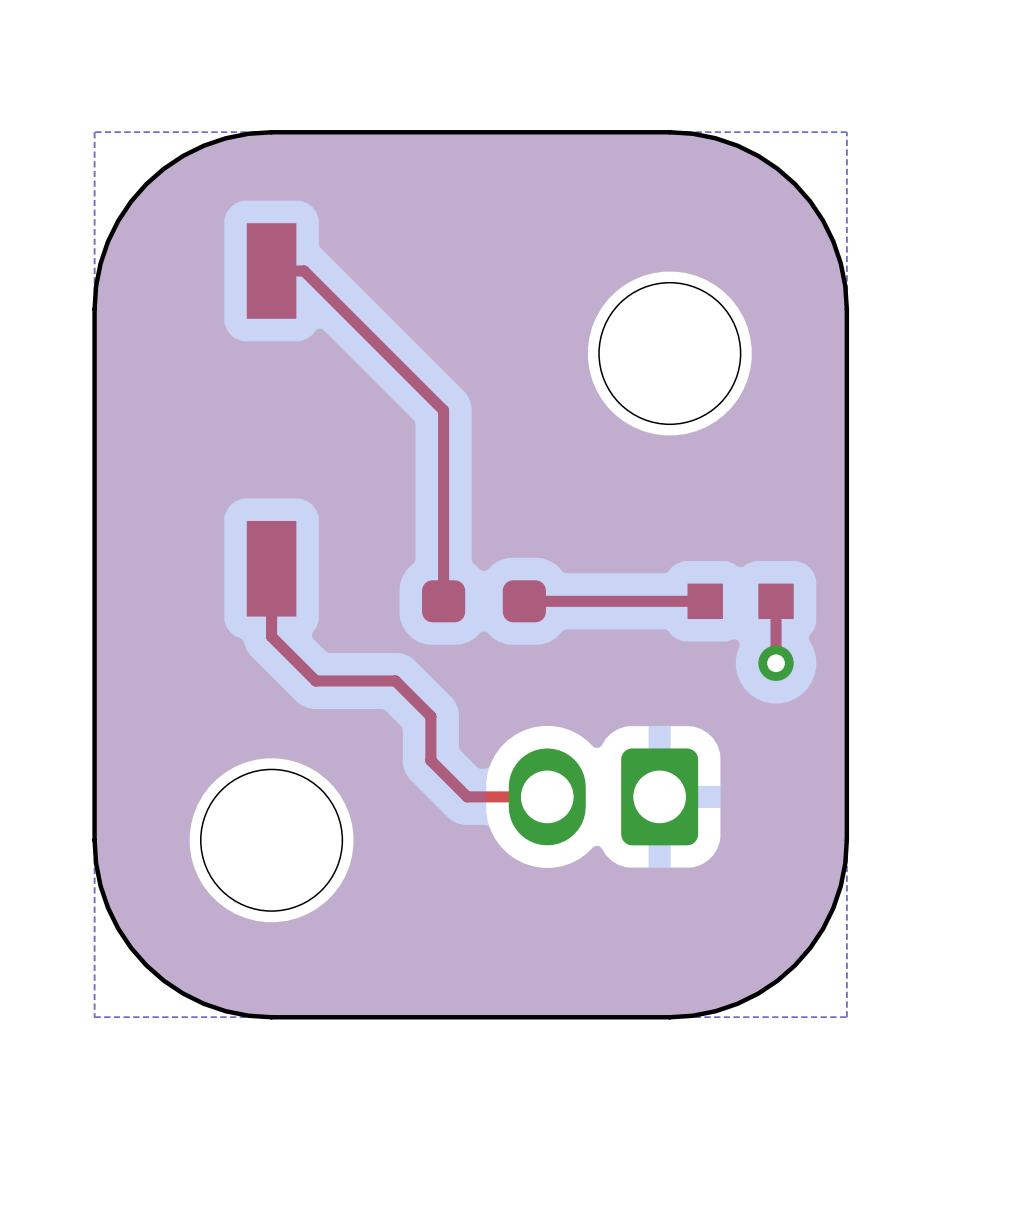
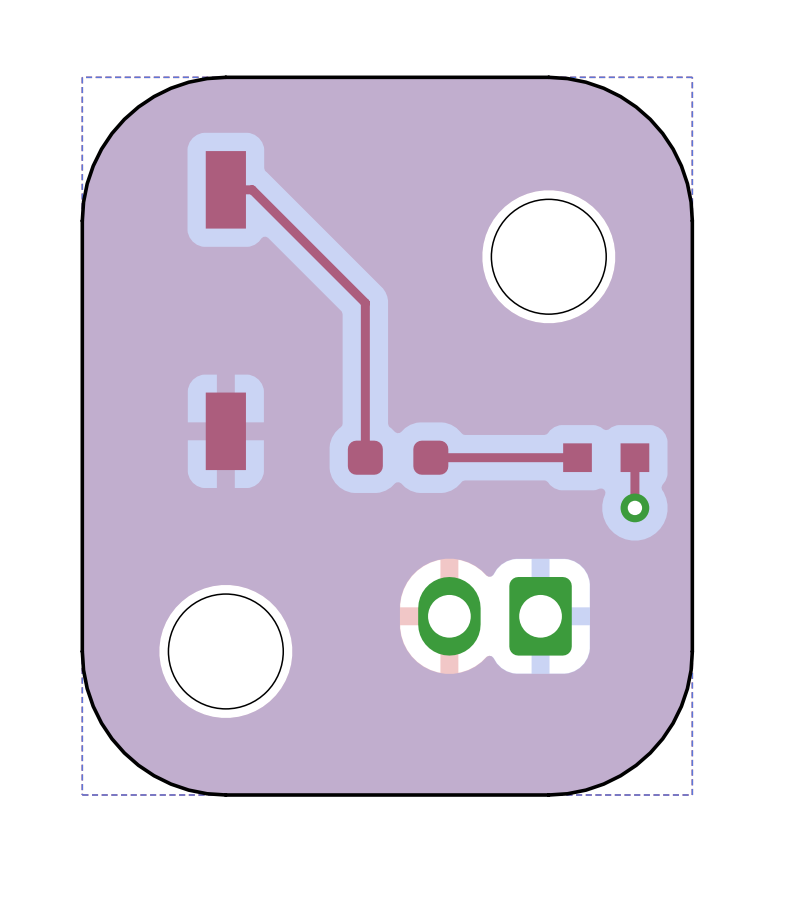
top track: (271, 568) (271, 636) (315, 680) (395, 680) (430, 716) (430, 760) (467, 796) (547, 796) -> none

